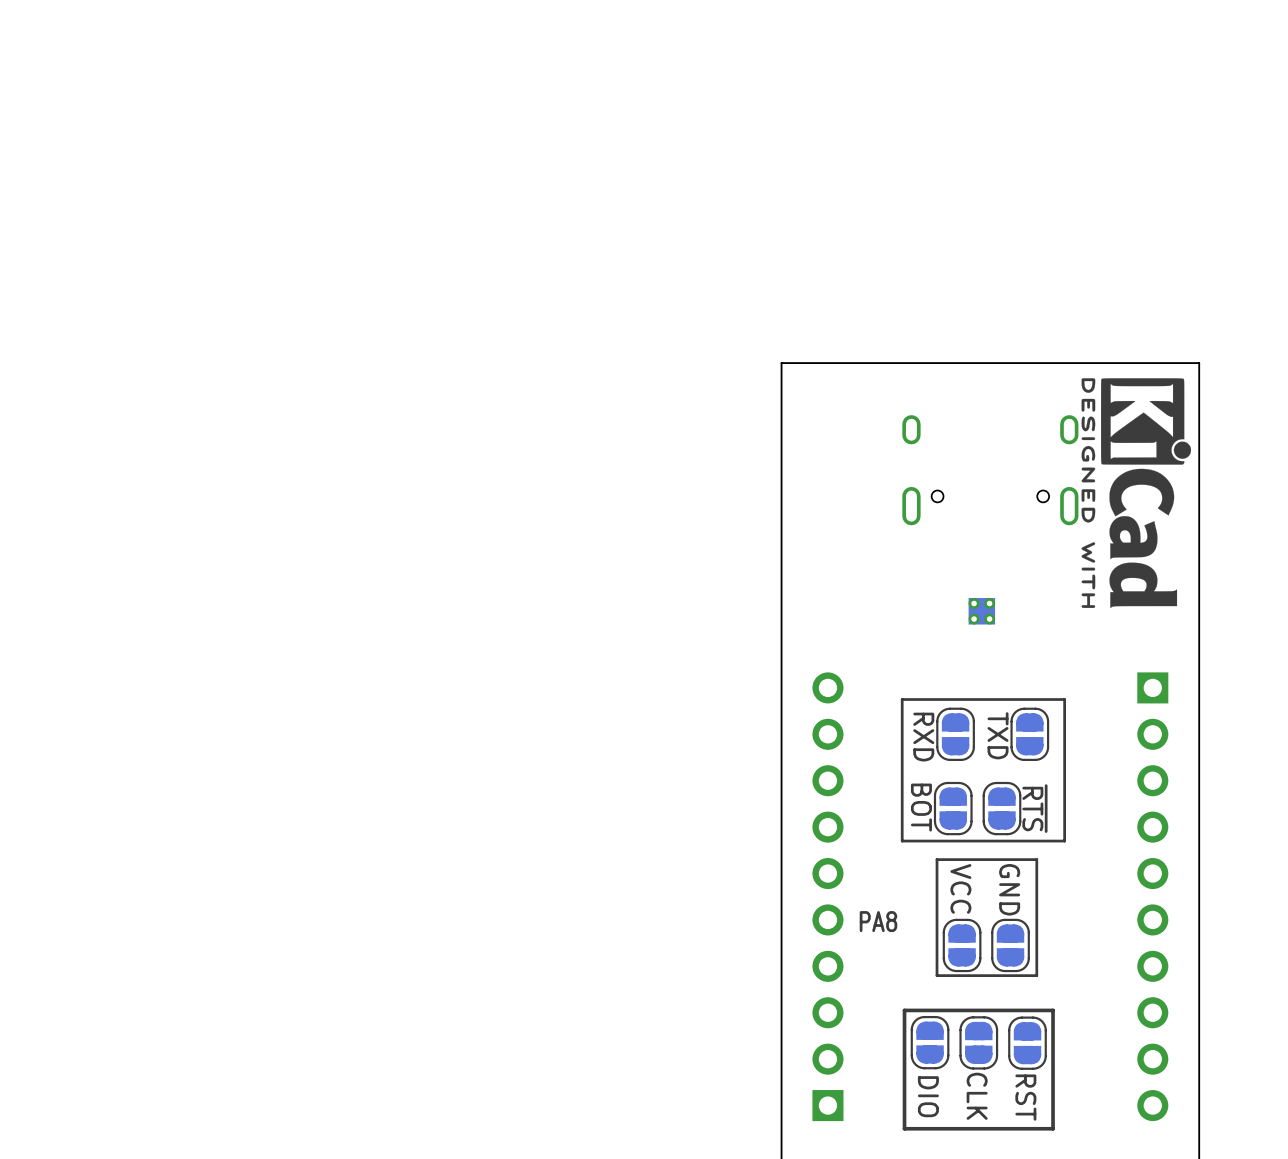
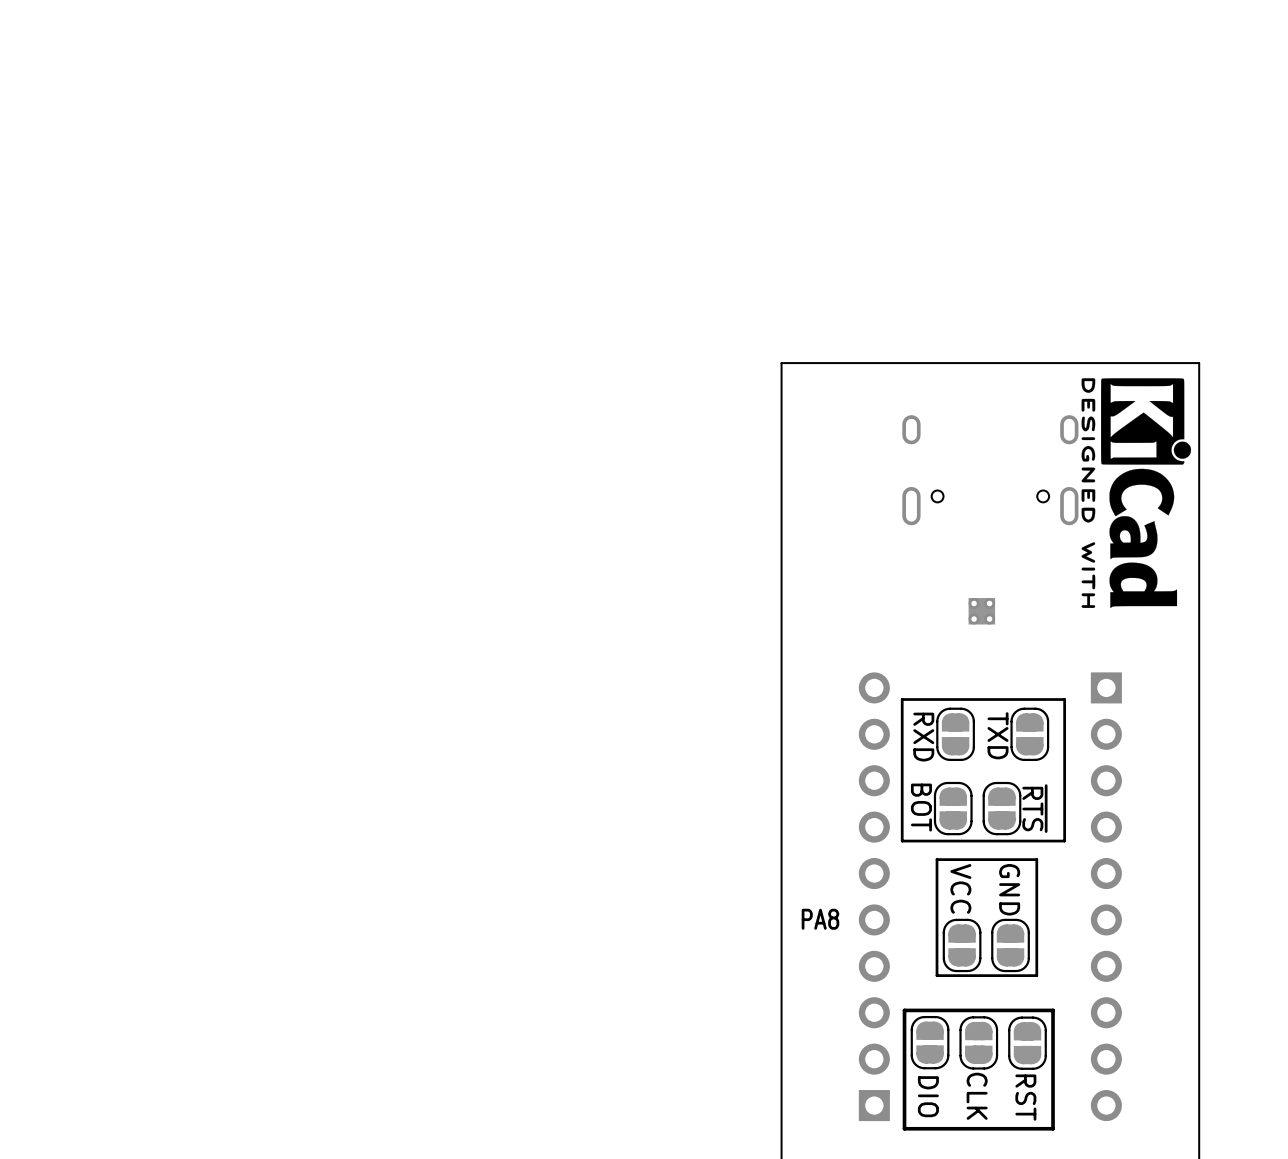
part position: (827, 896) -> (874, 896)
part position: (1152, 896) -> (1106, 896)
text position: PA8 (878, 921) -> PA8 (820, 919)

